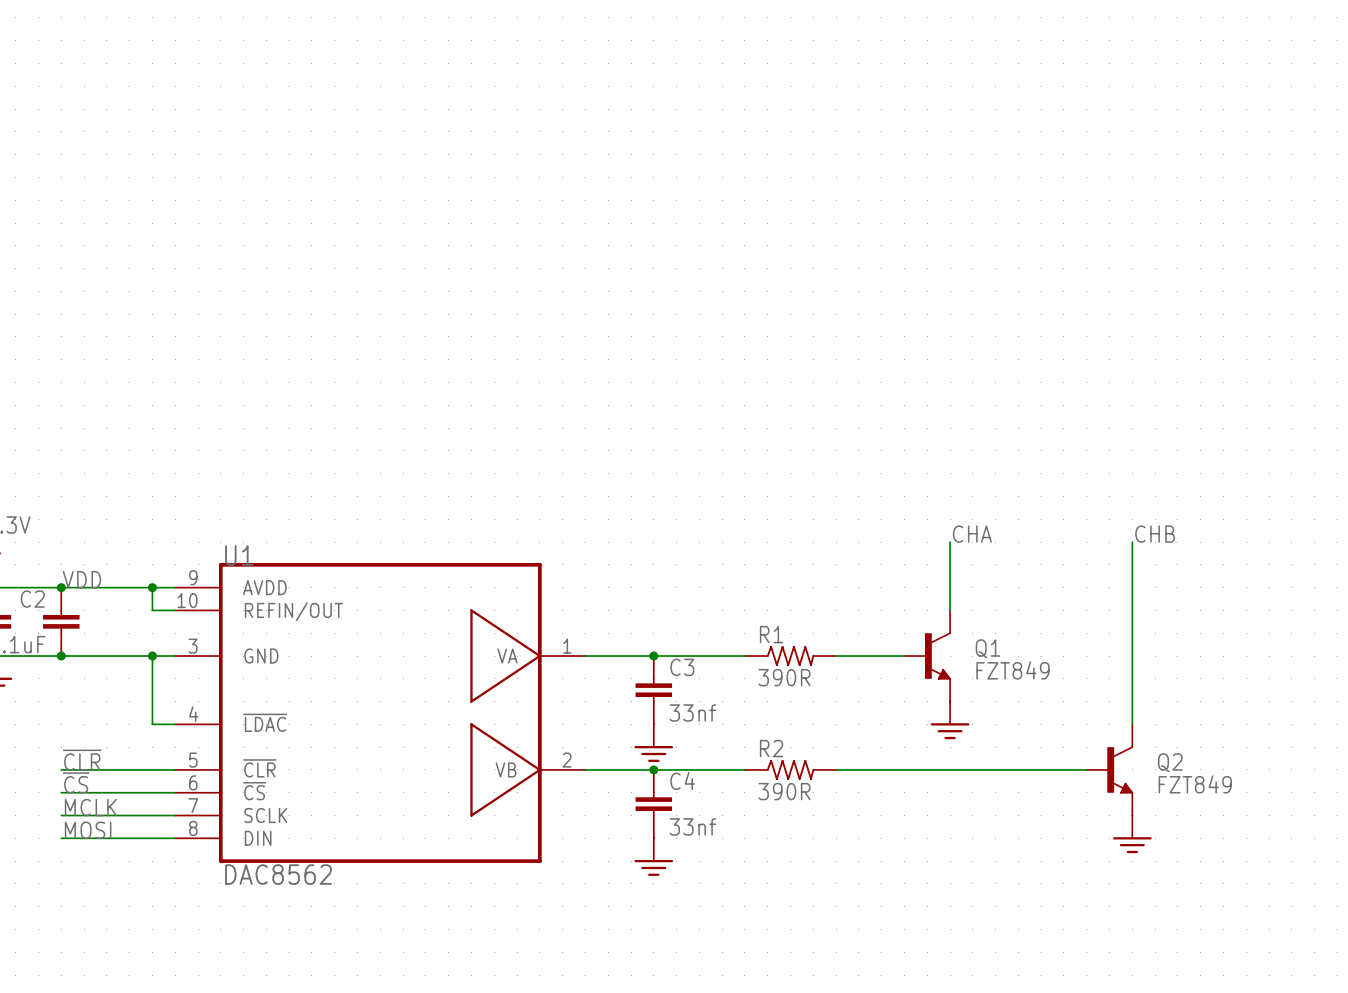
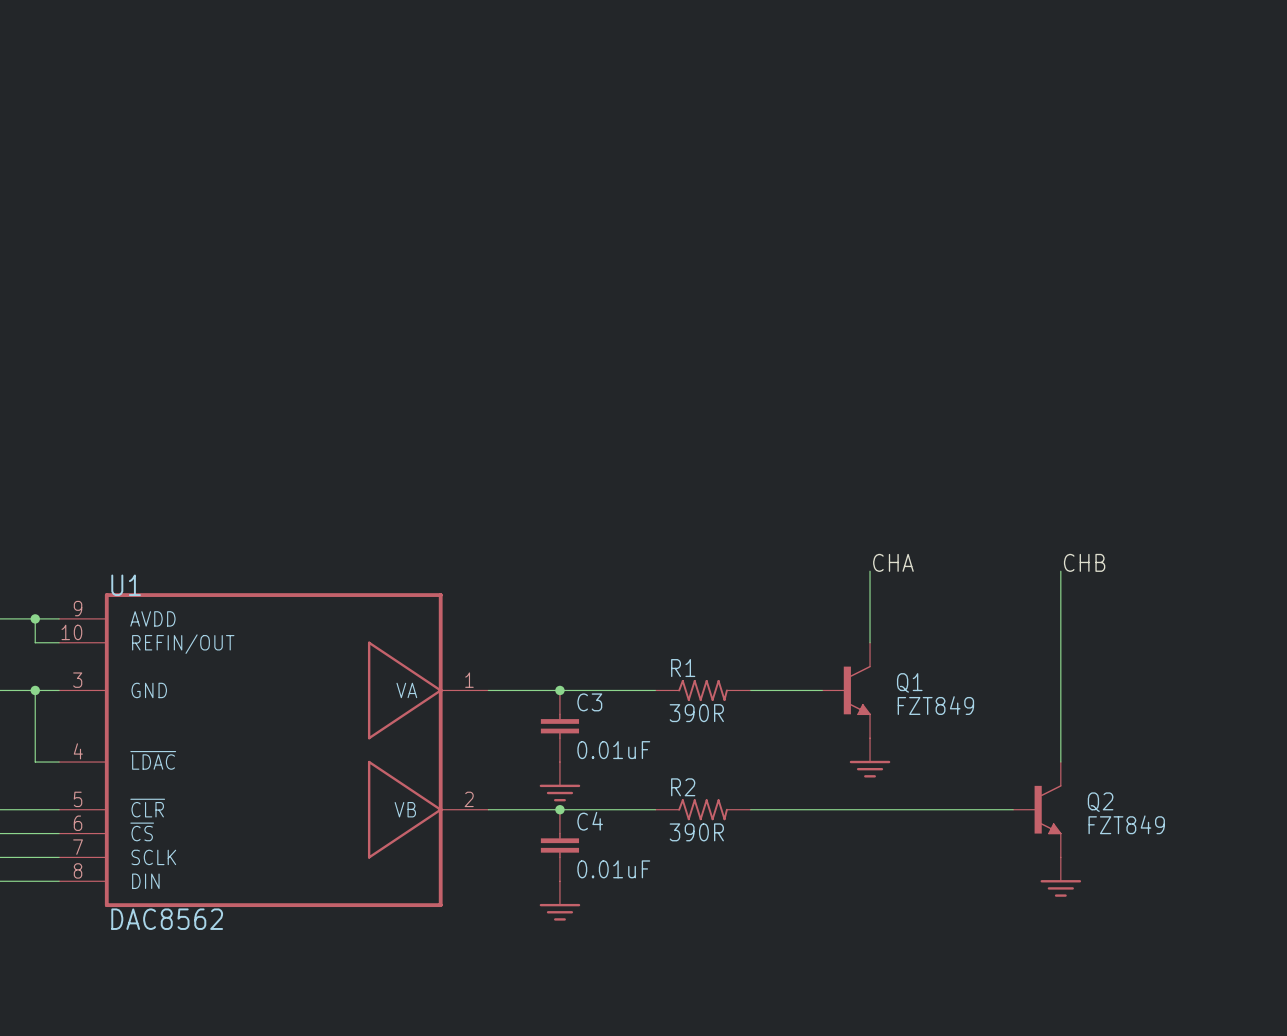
C3 value: 33nf (692, 712) -> 0.01uF (613, 750)
C4 value: 33nf (692, 826) -> 0.01uF (613, 869)

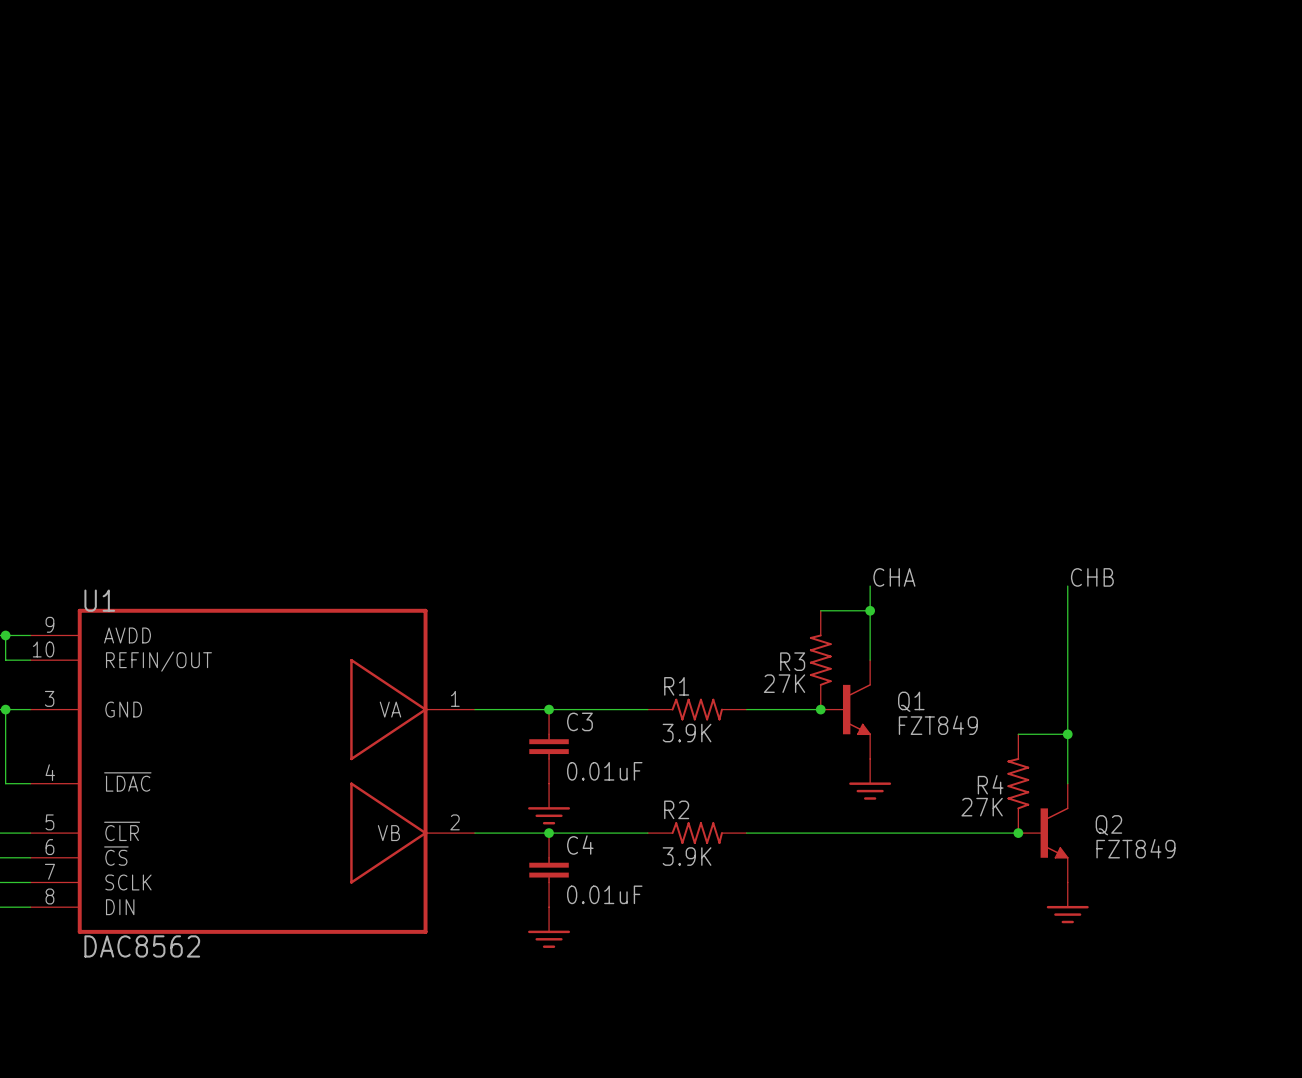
wire: none -> (820, 610) (870, 610)
junction: none -> (870, 610)
R3: none -> 27K (820, 660)
junction: none -> (820, 709)
R1 value: 390R (696, 713) -> 3.9K (687, 733)
wire: none -> (1018, 734) (1067, 734)
junction: none -> (1067, 734)
R4: none -> 27K (1018, 783)
junction: none -> (1018, 833)
R2 value: 390R (696, 832) -> 3.9K (687, 856)

